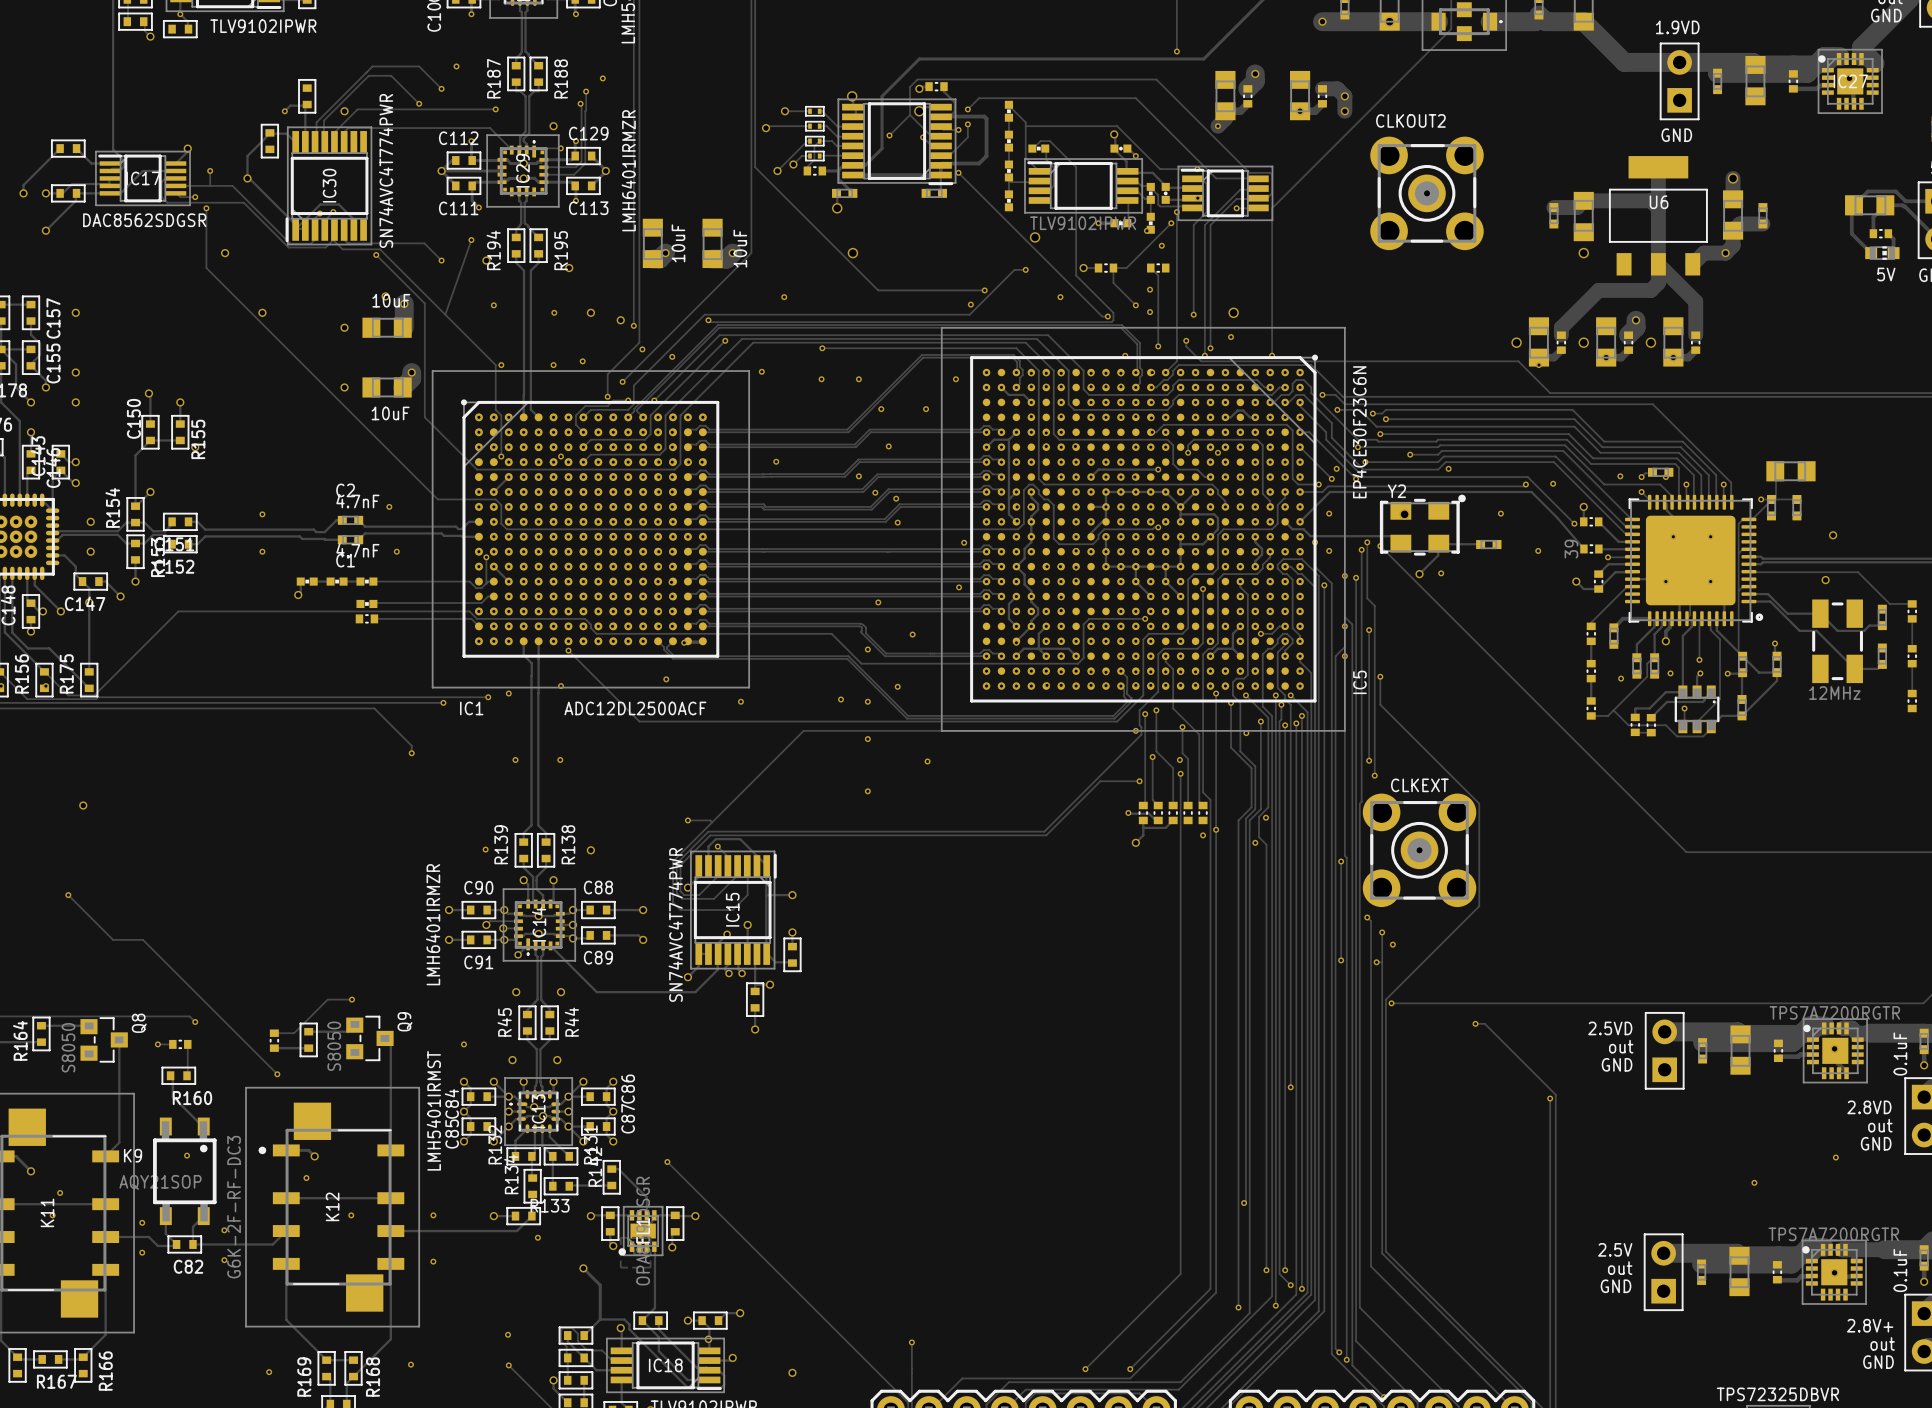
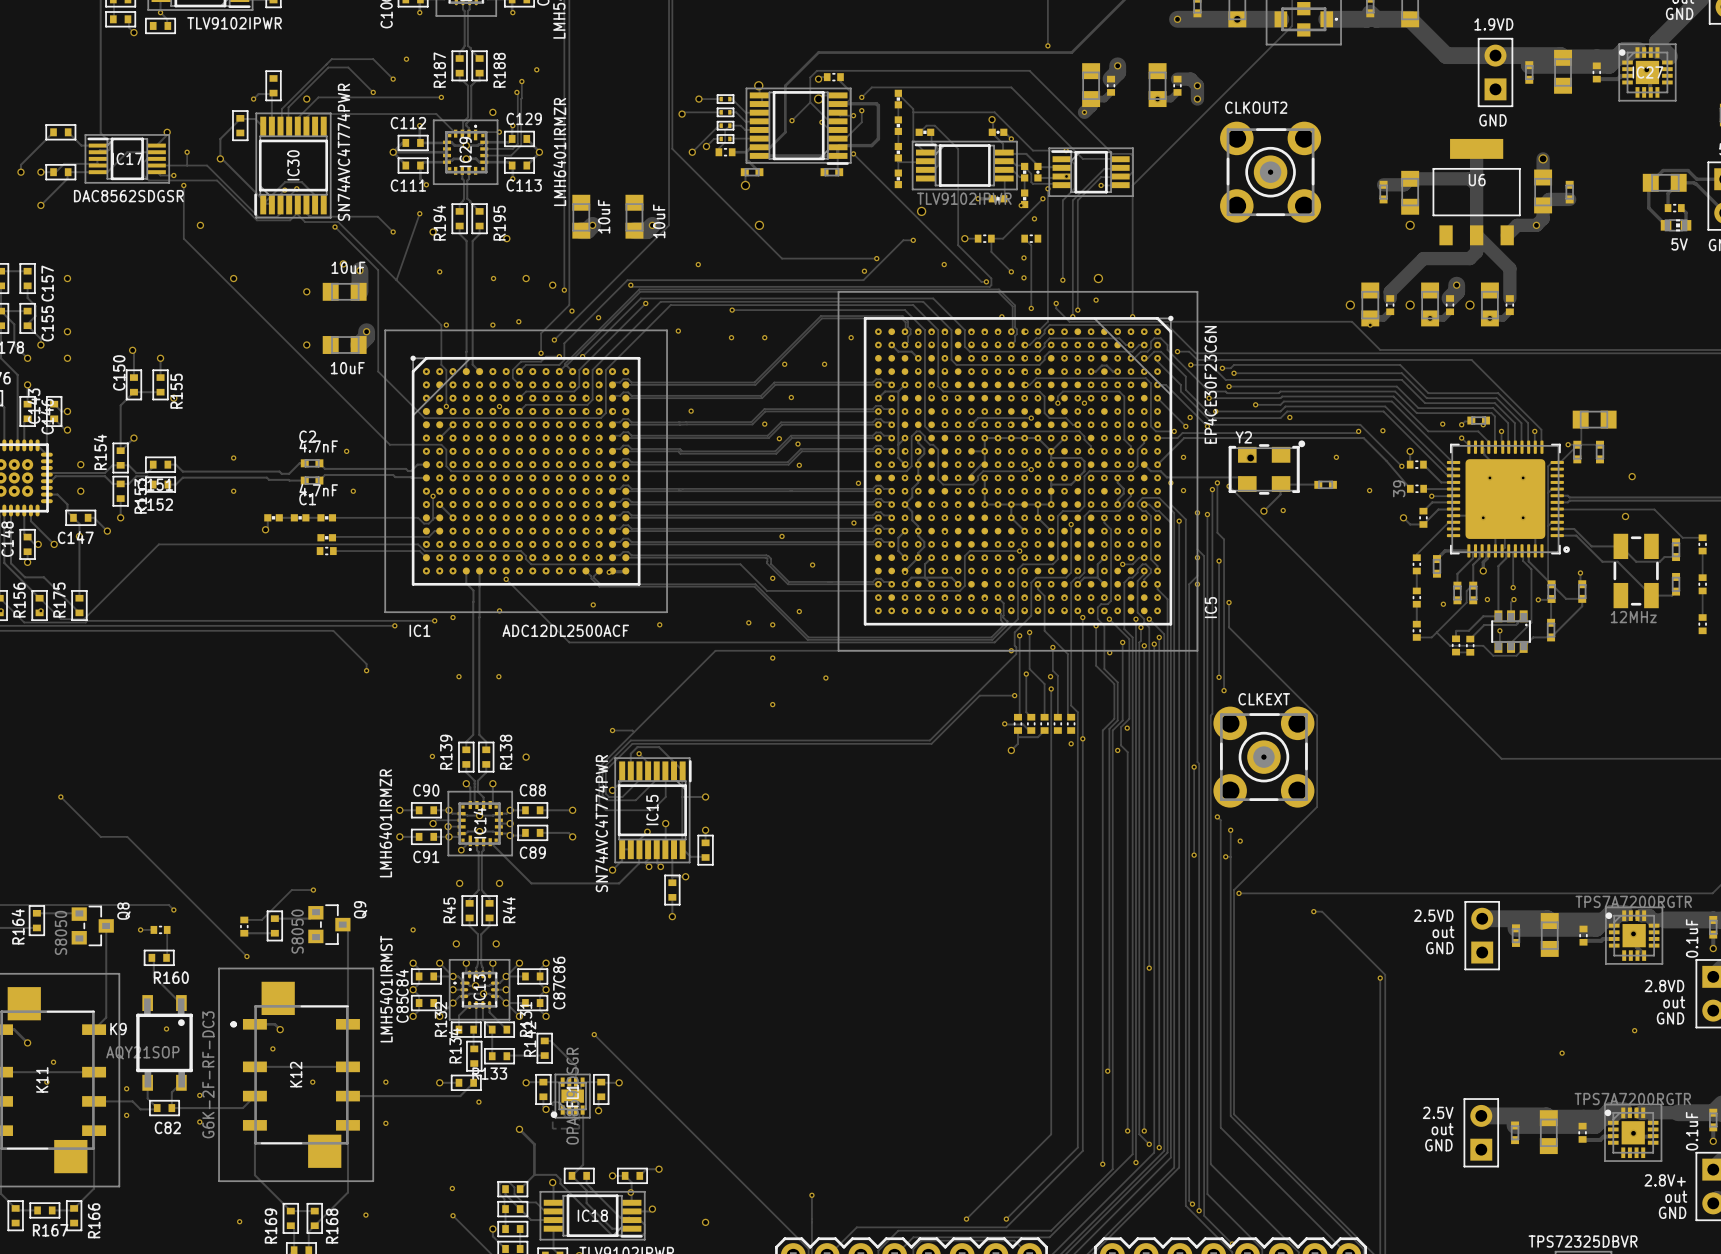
via: (83, 805) -> none

